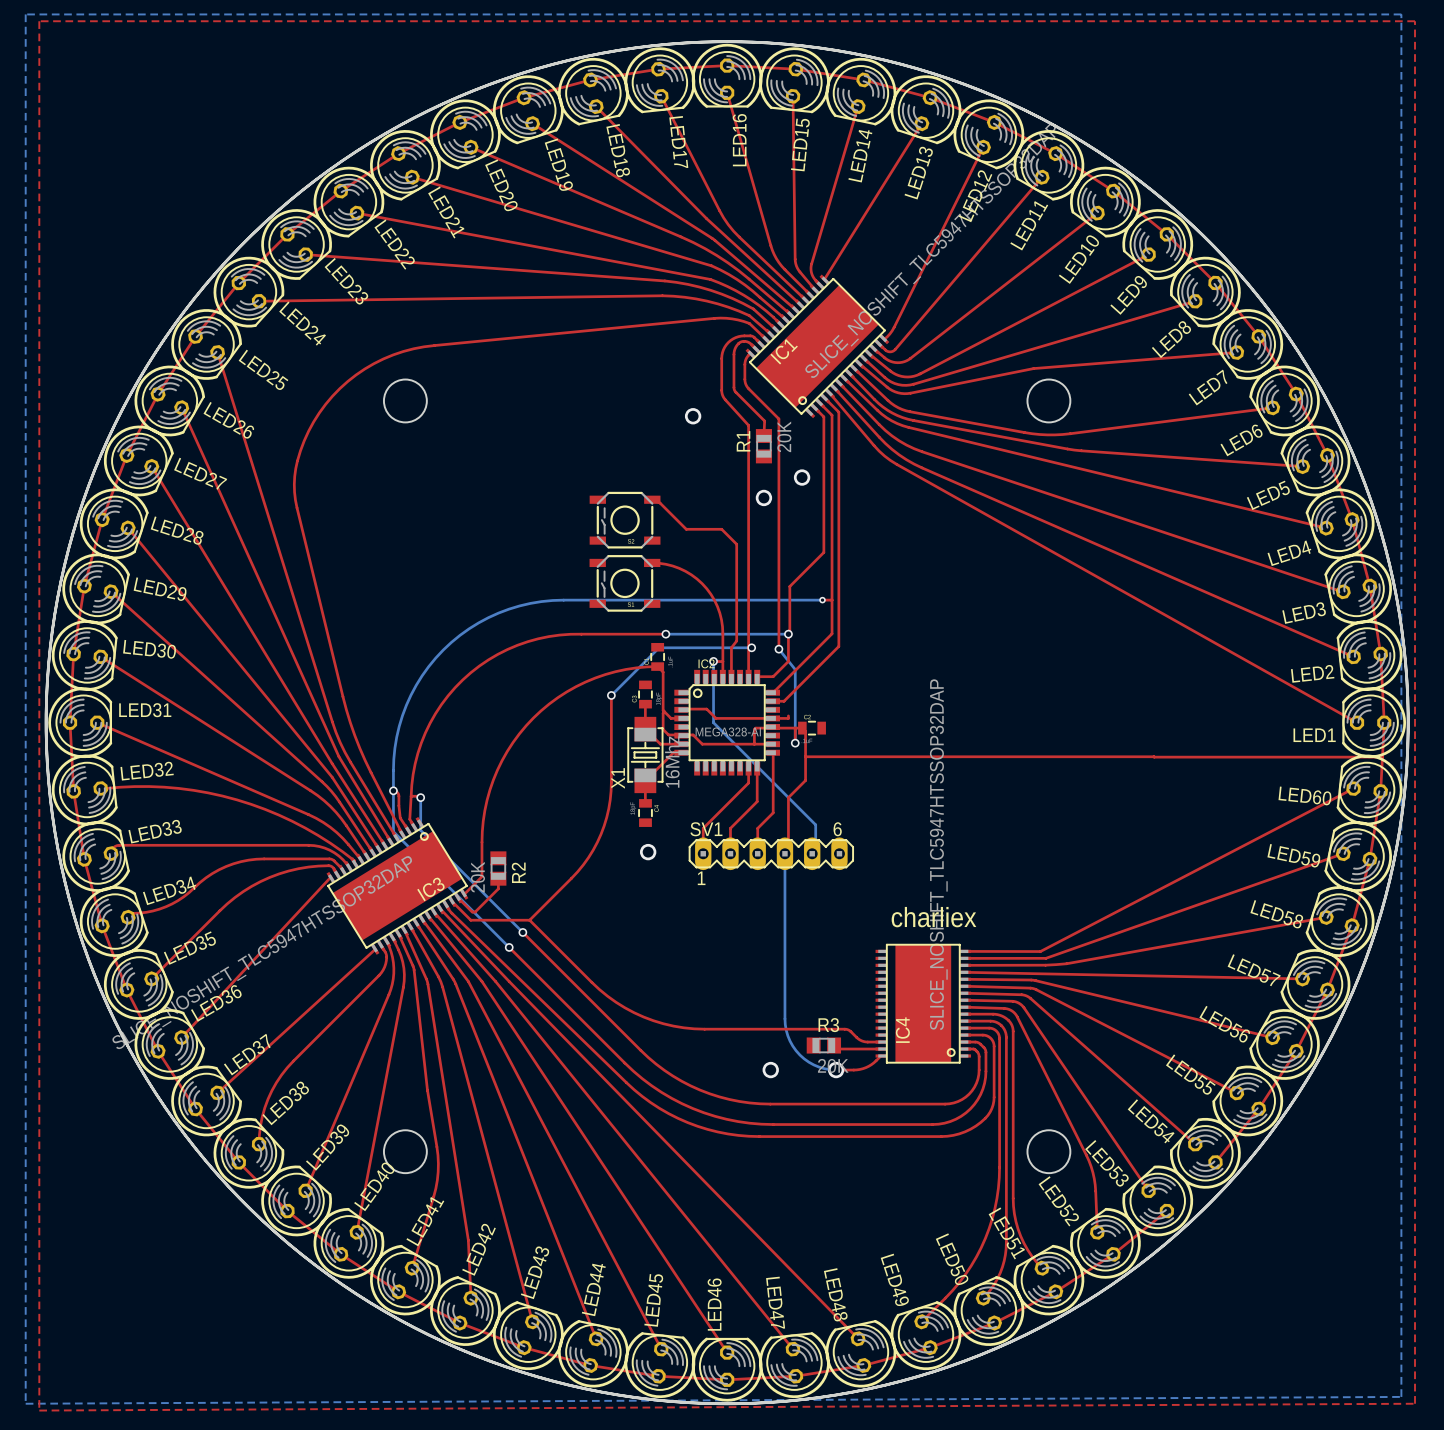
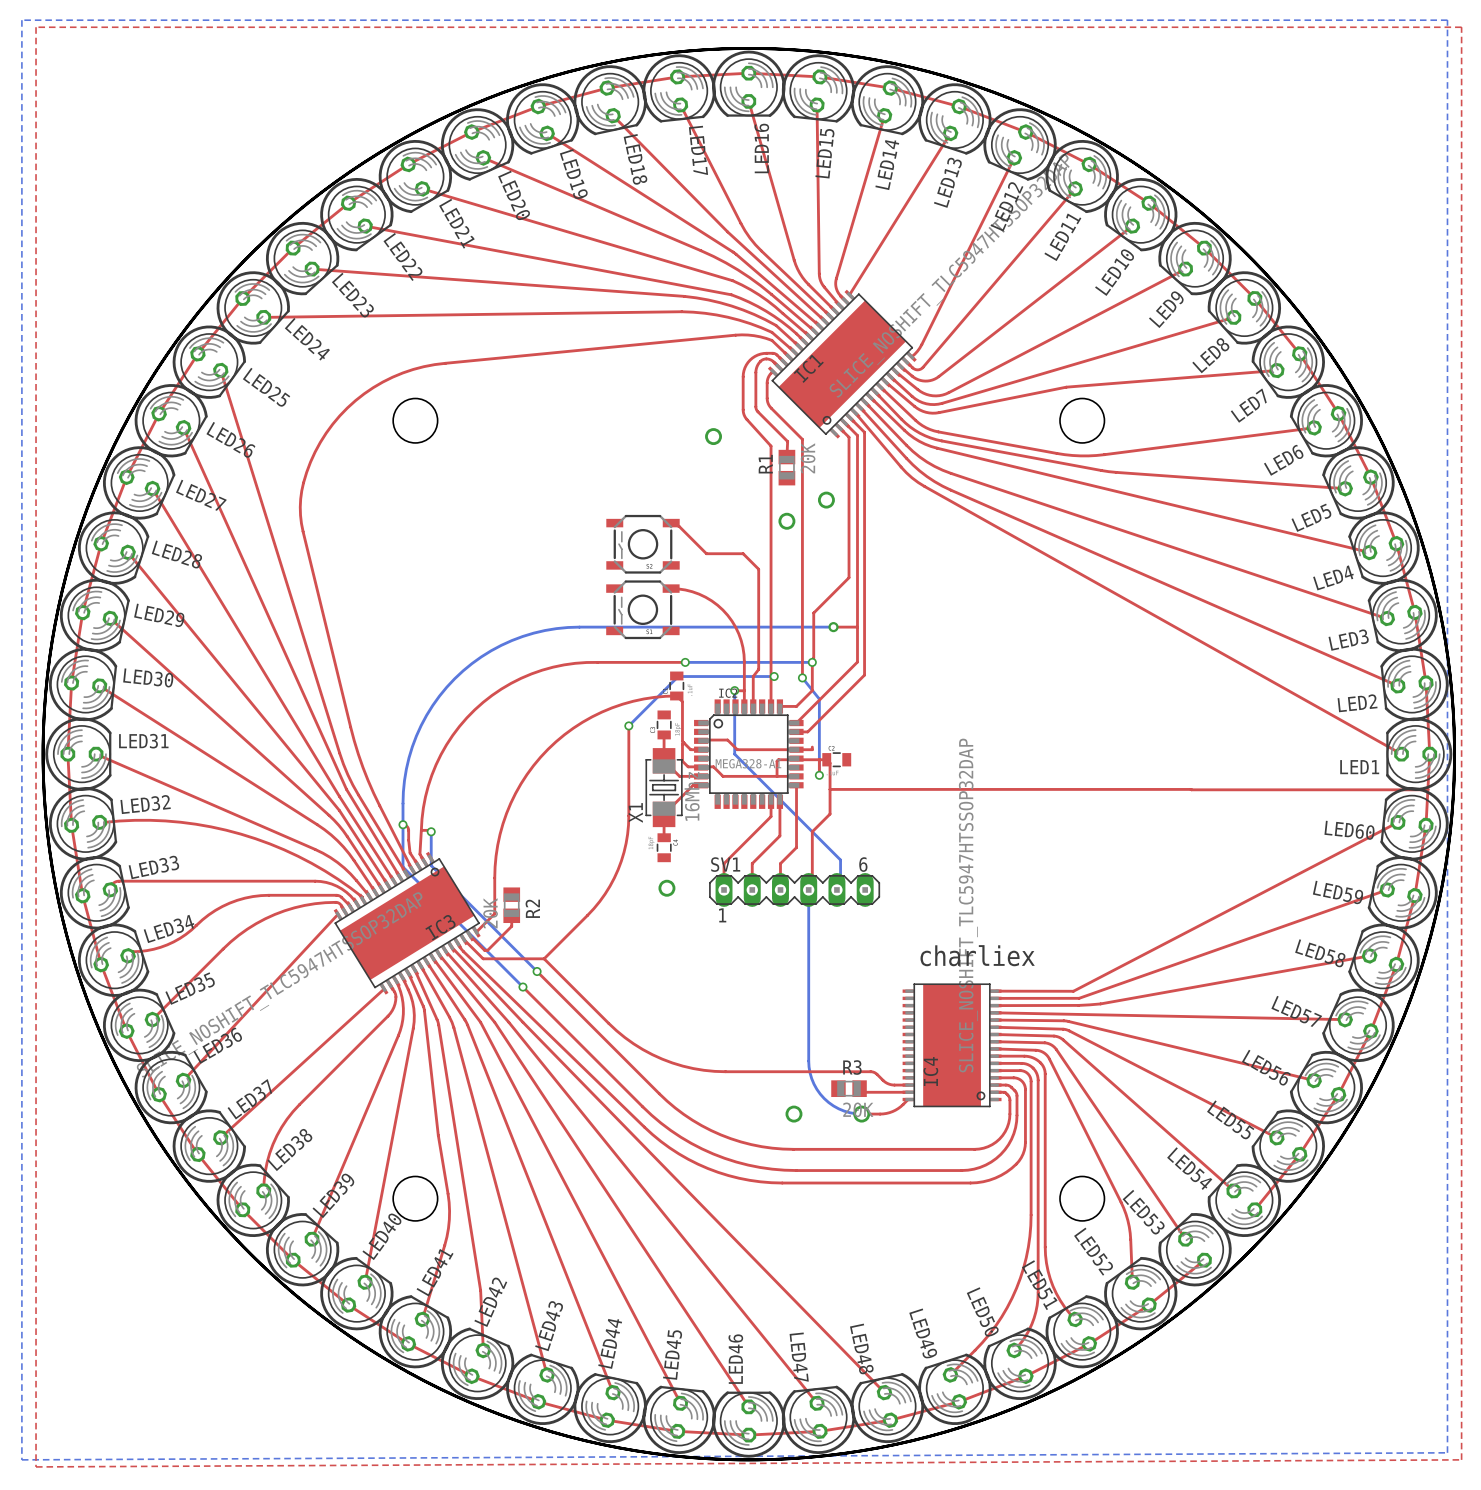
top track: none -> (833, 627) (847, 627)
bottom track: (808, 600) (822, 600) -> none
via: none -> (833, 627)
via: (822, 600) -> none

